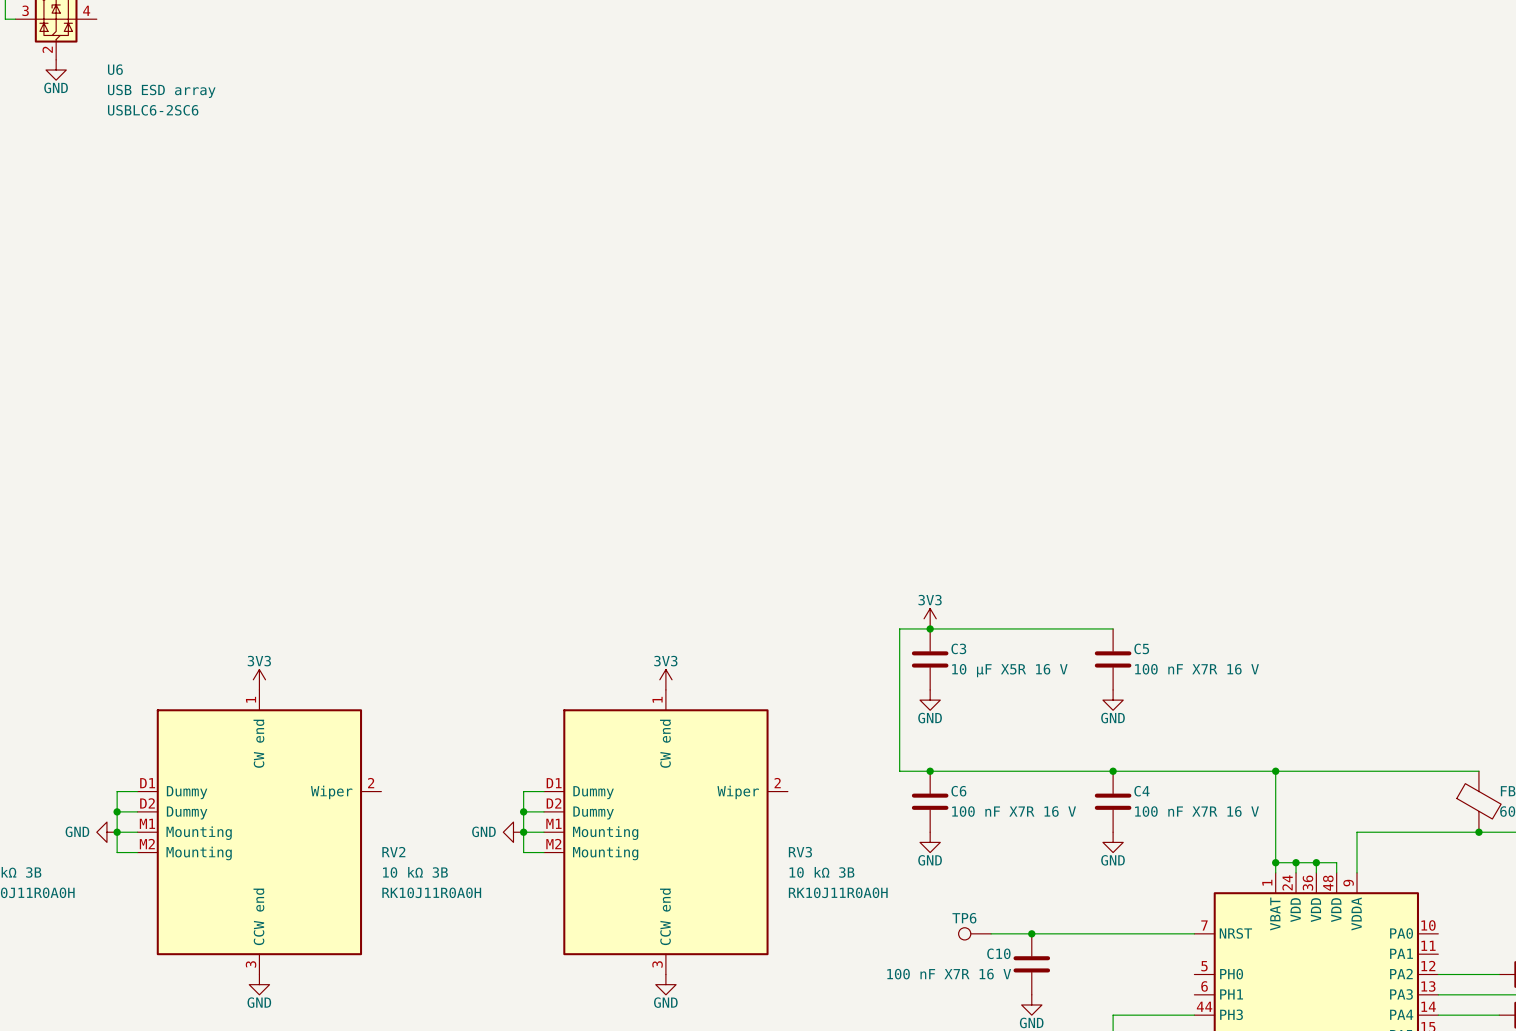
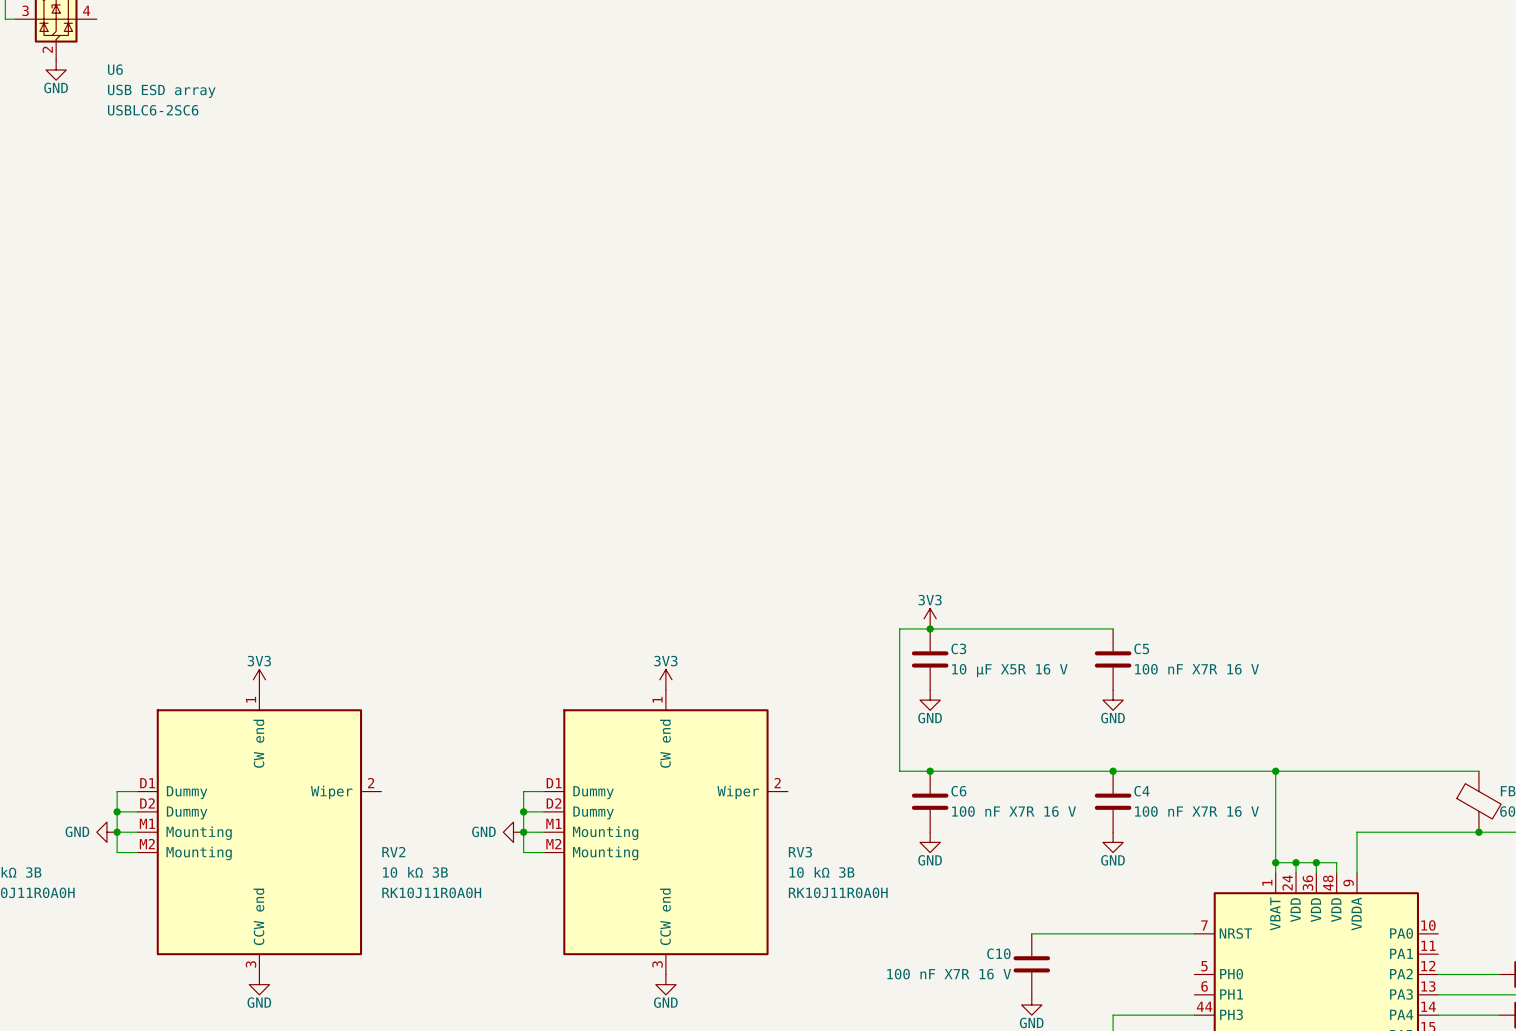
TP6: (974, 933) -> none
wire: (991, 933) (1031, 933) -> none
junction: (1031, 933) -> none

